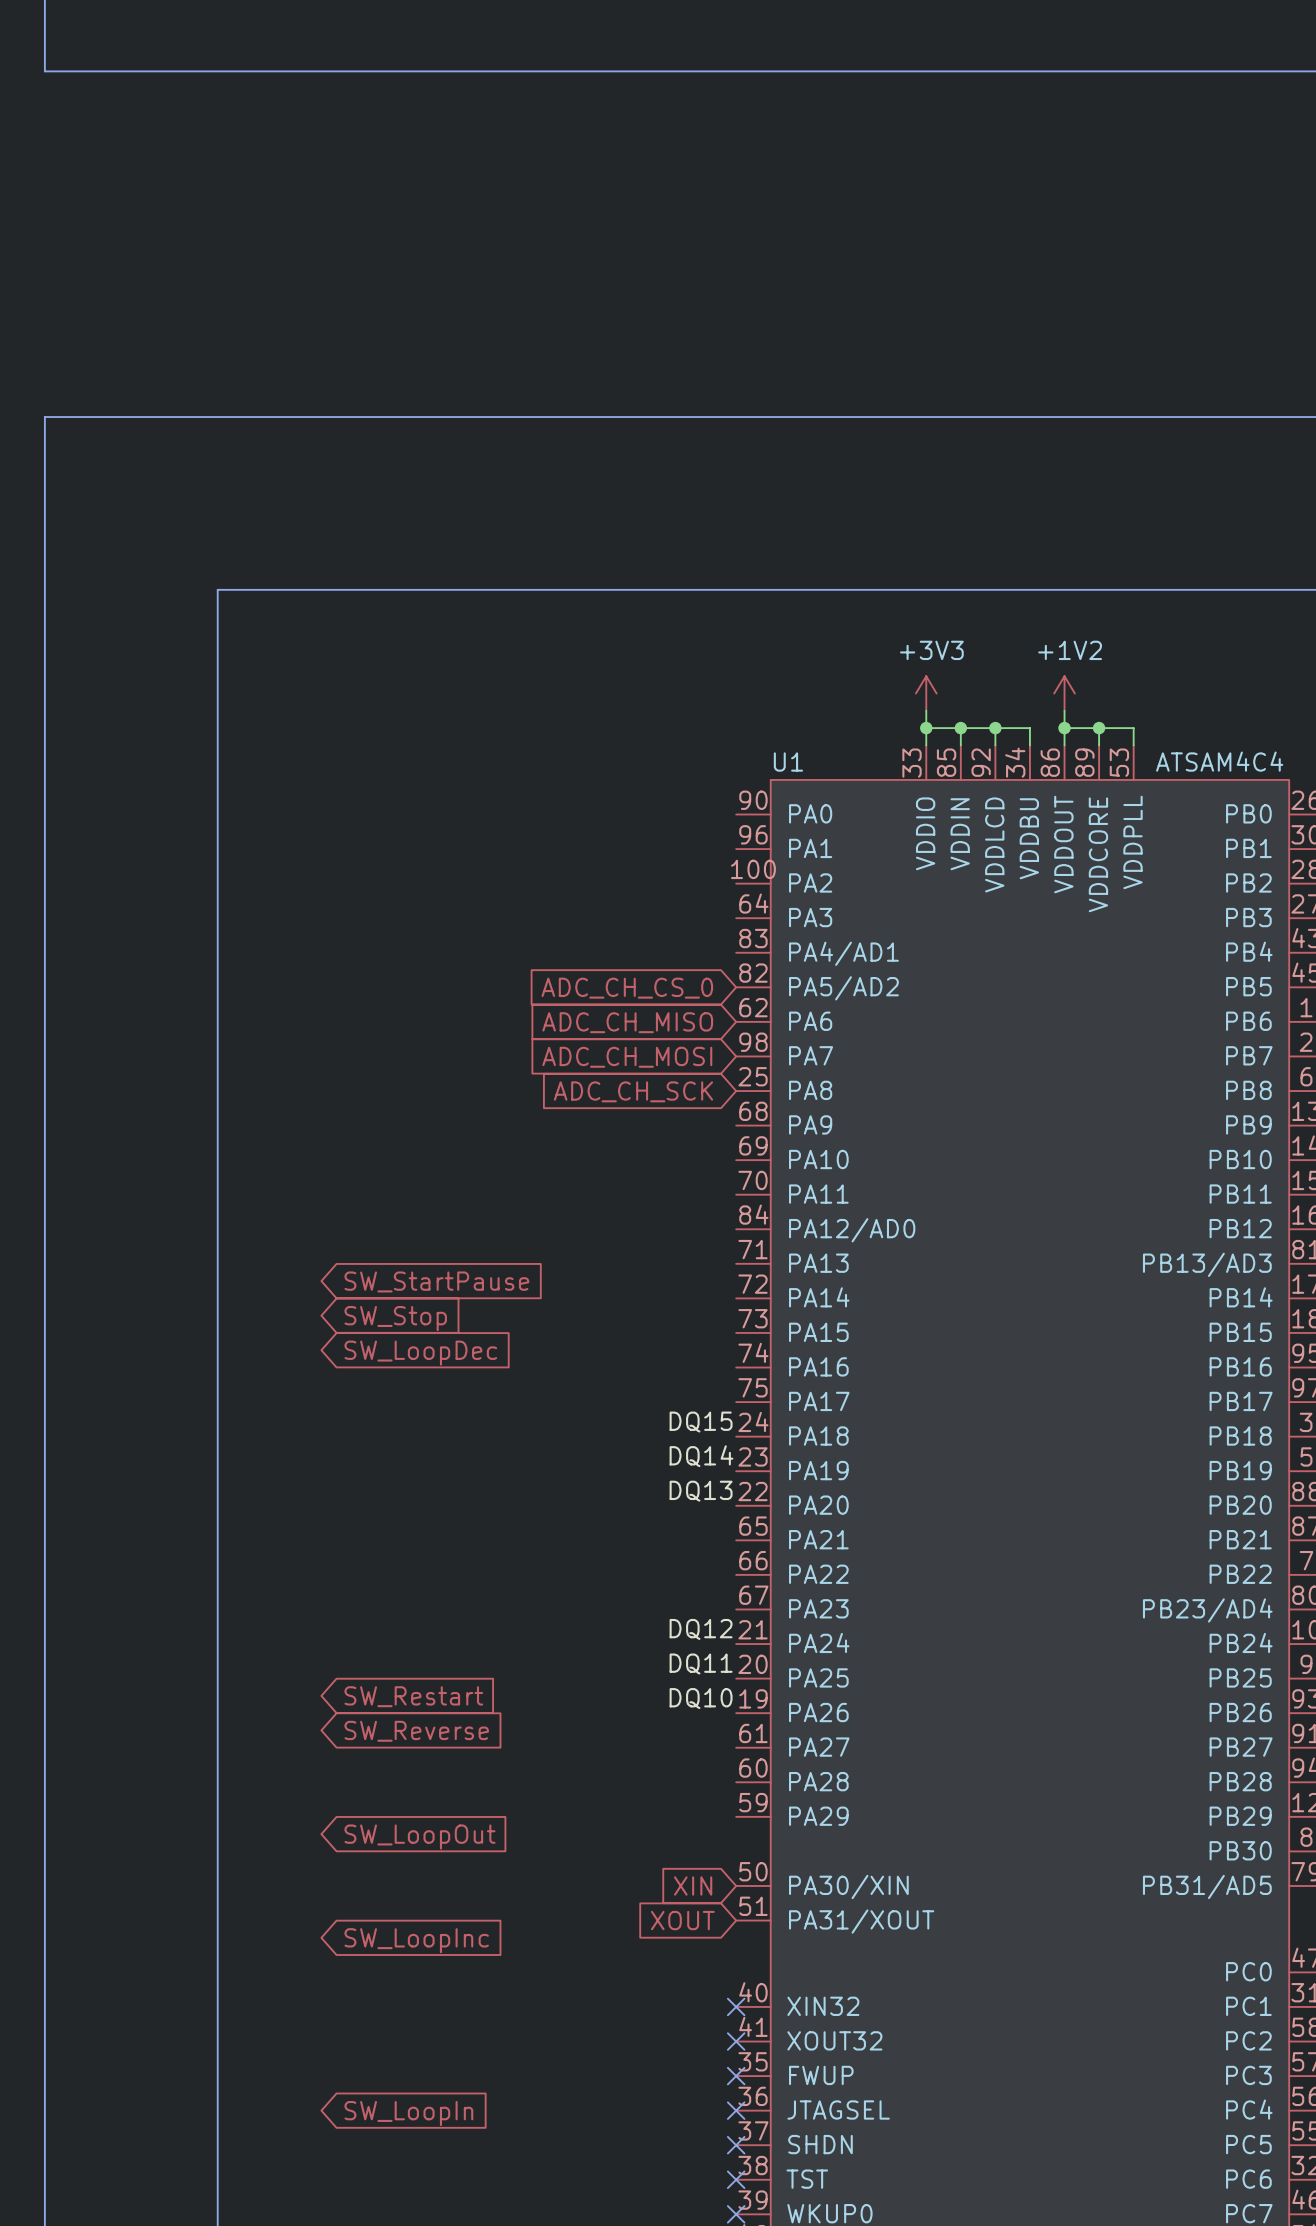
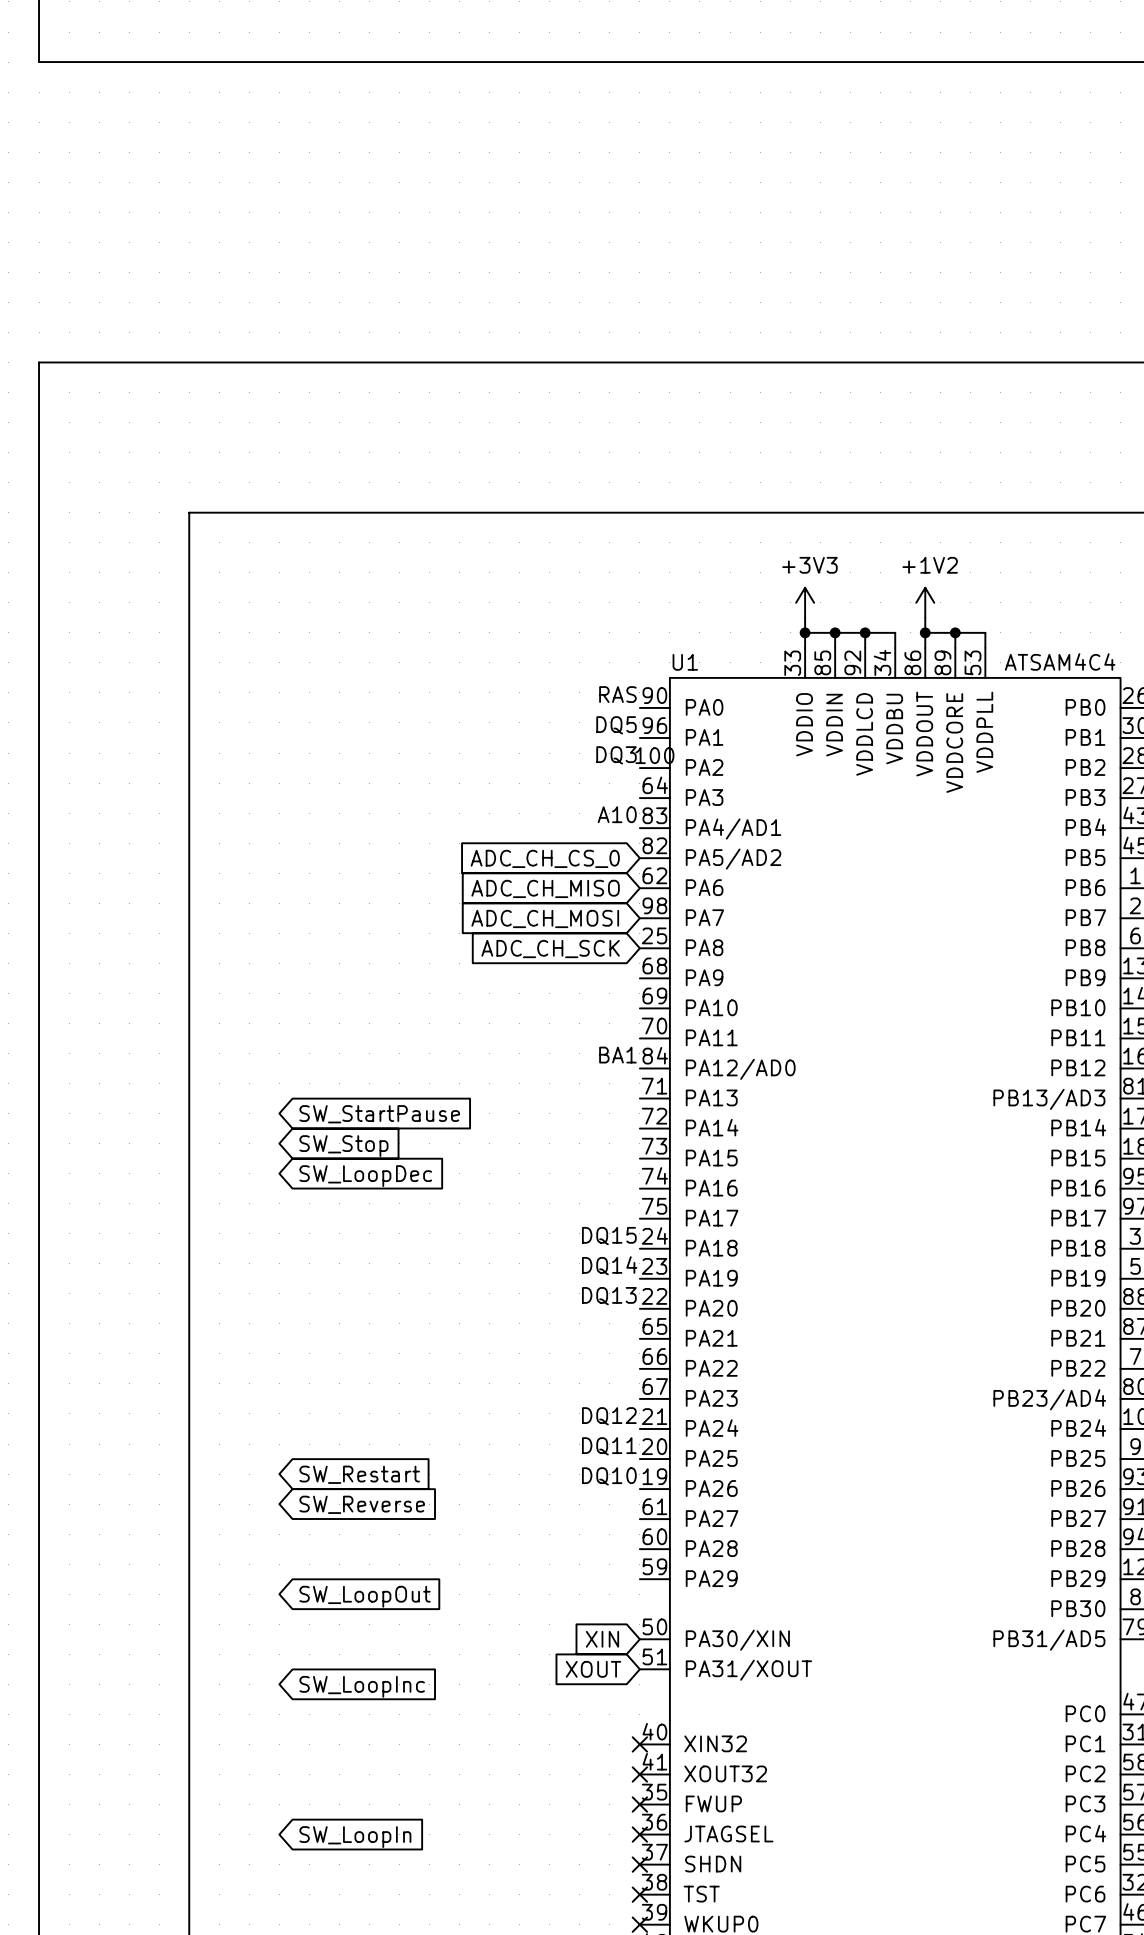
label: none -> RAS (617, 694)
label: none -> DQ5 (616, 725)
label: none -> DQ3 (616, 755)
label: none -> A10 (617, 814)
label: none -> BA1 (617, 1055)

